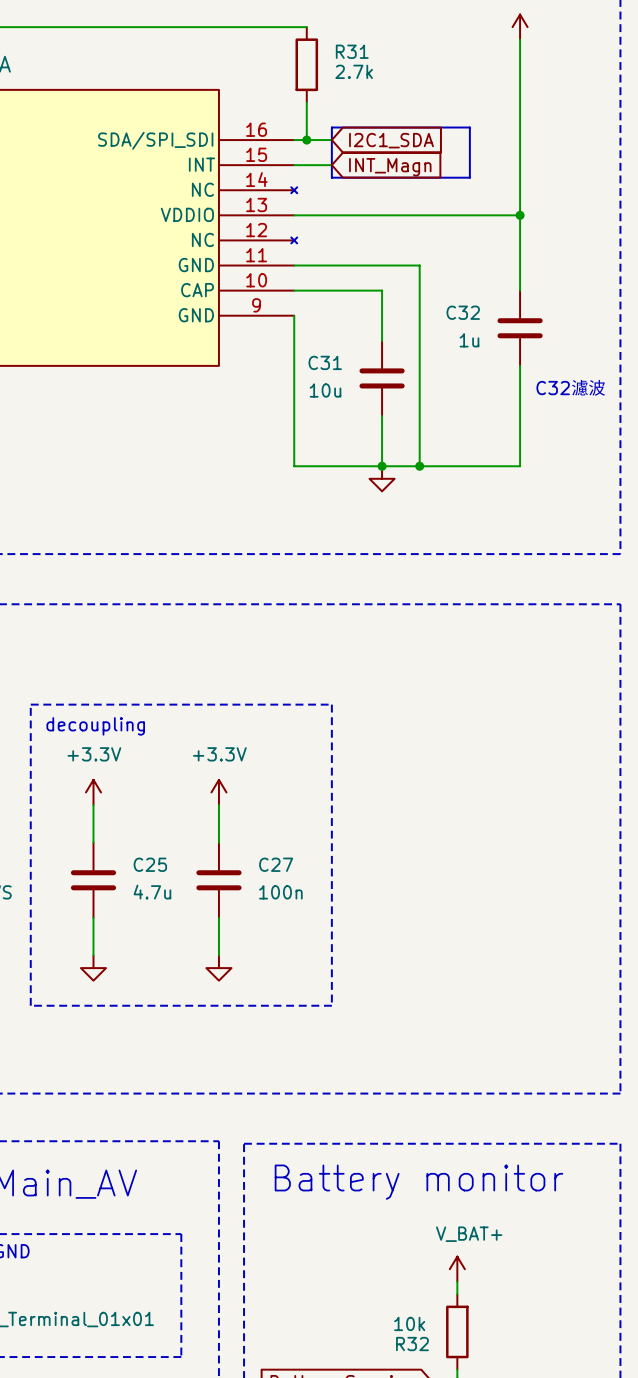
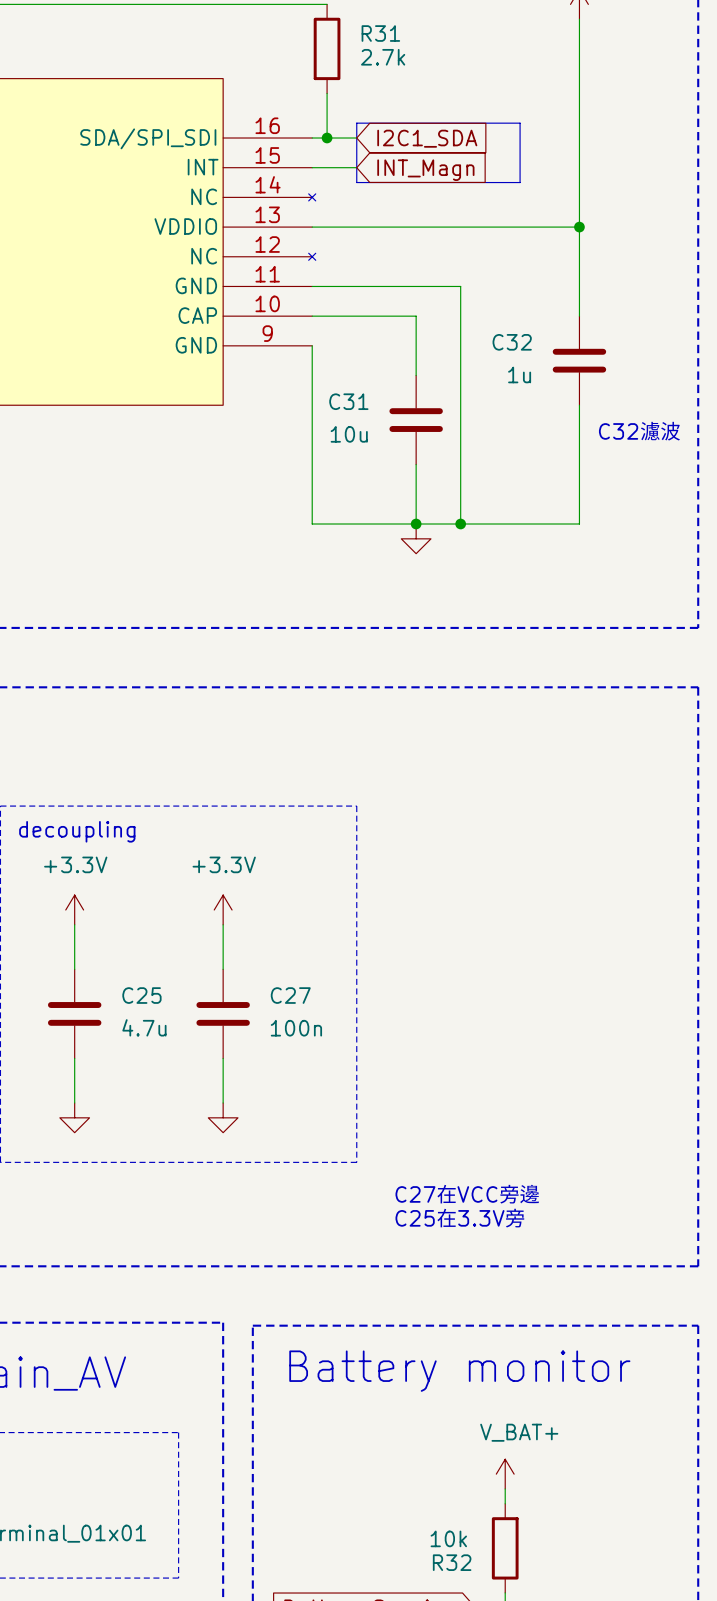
text: none -> C27在VCC旁邊 (467, 1194)
text: none -> C25在3.3V旁 (460, 1218)

